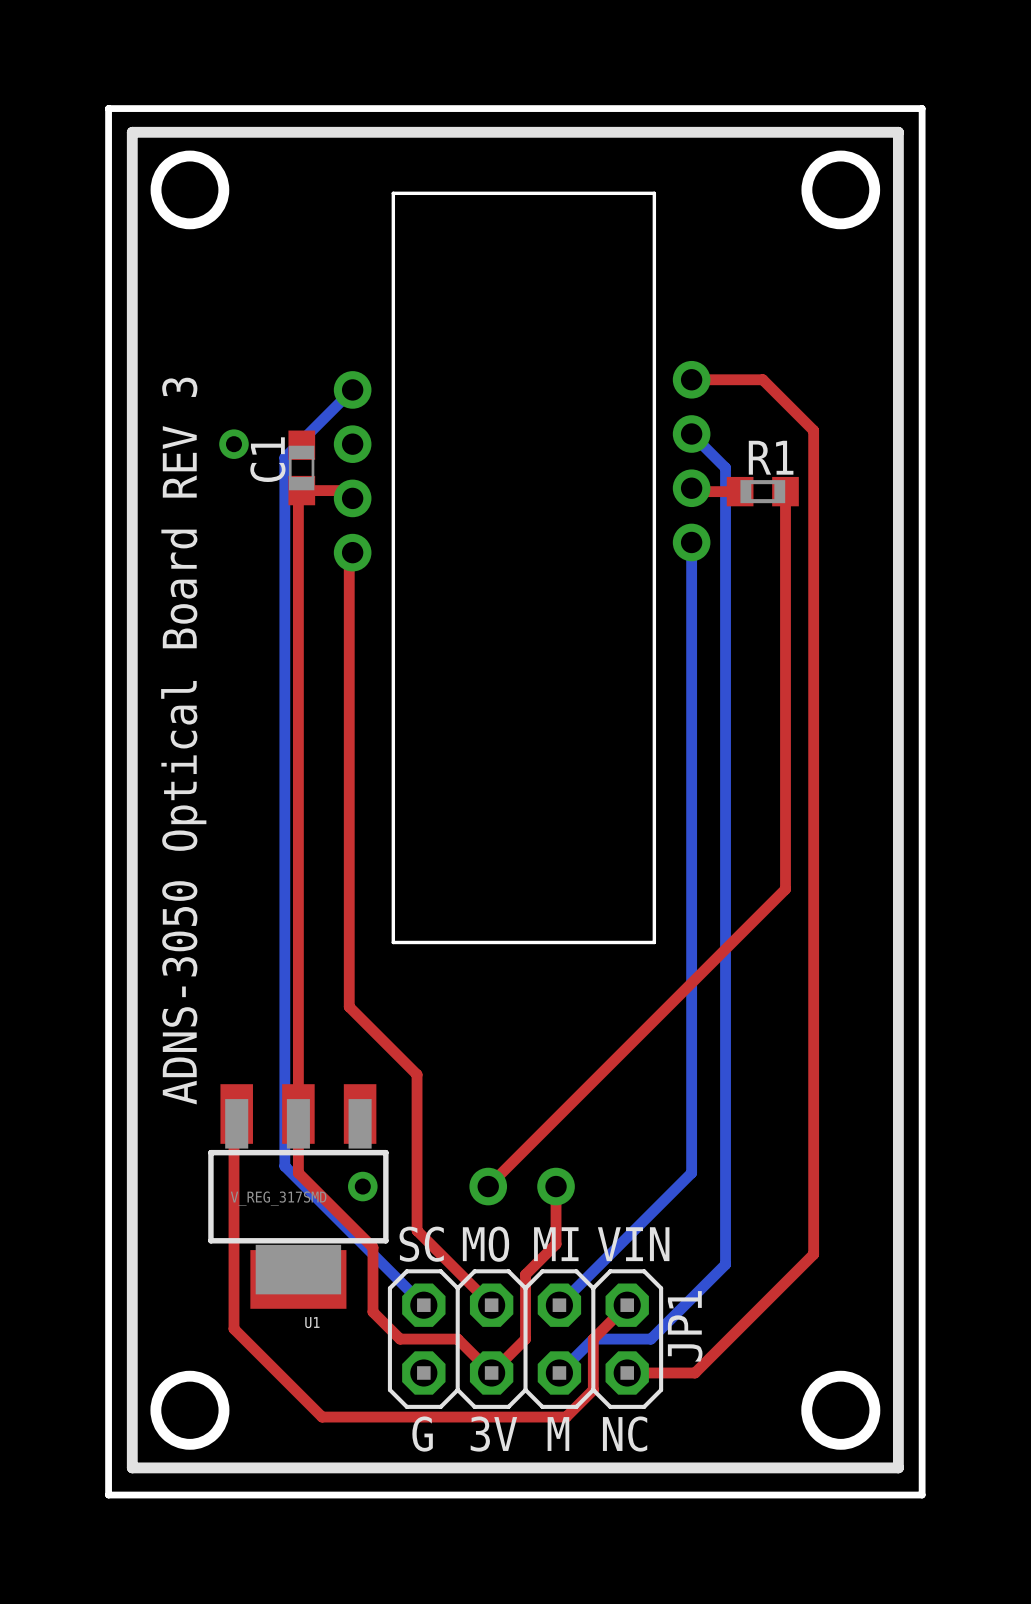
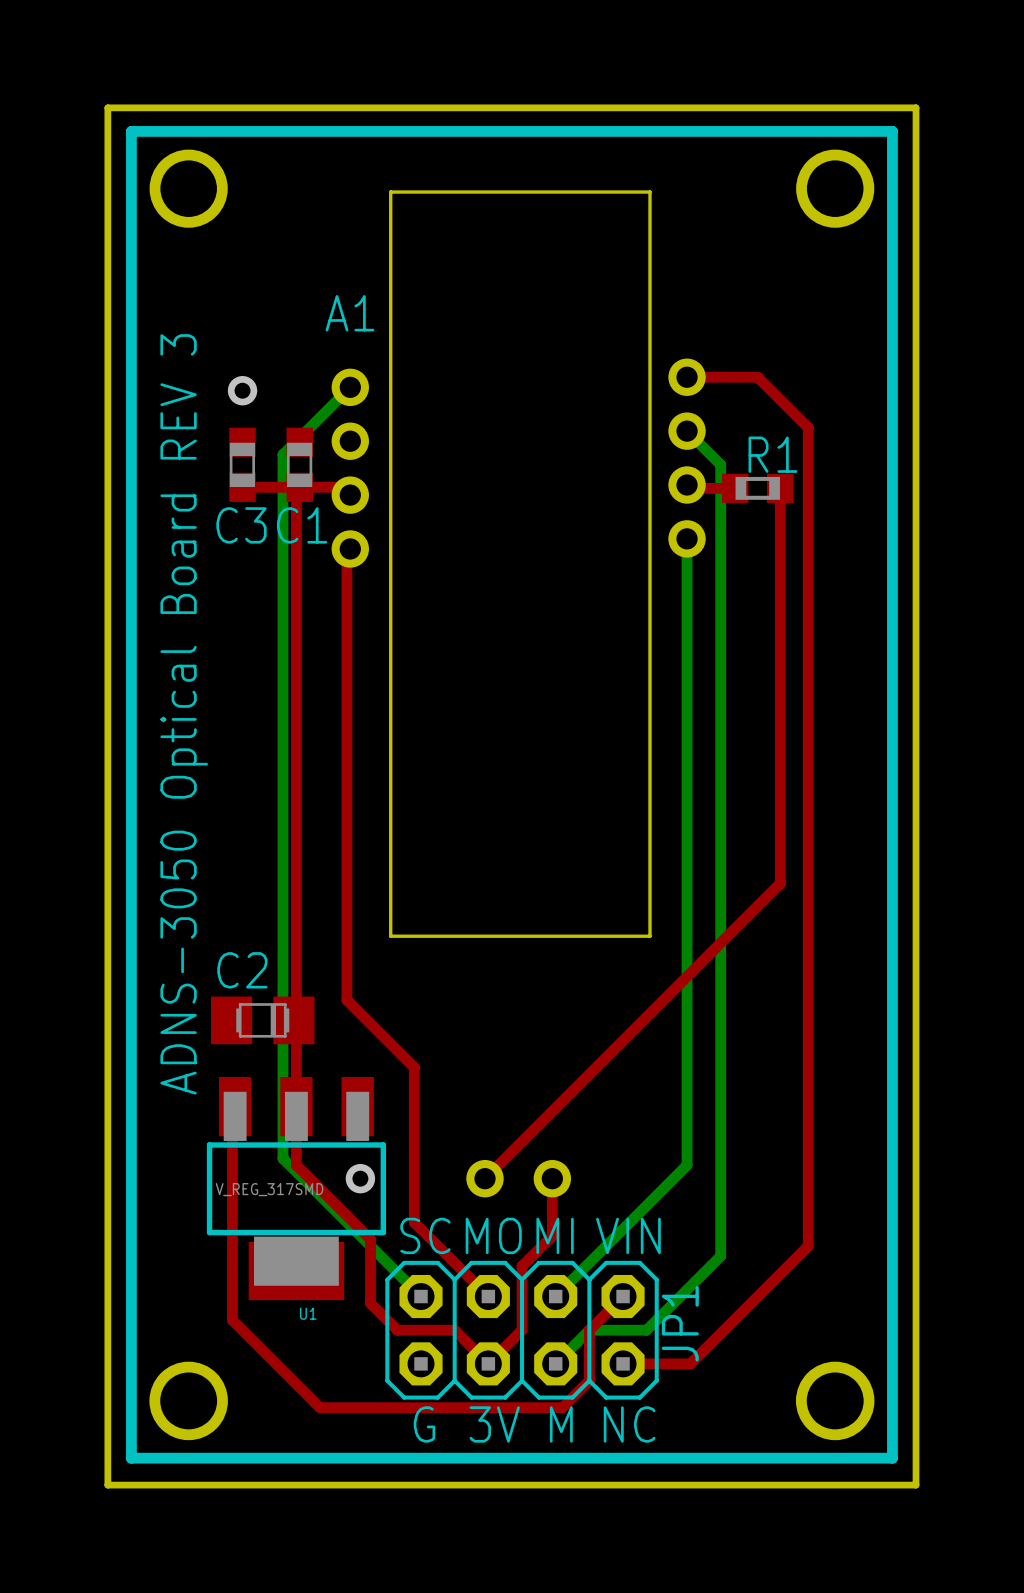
text: none -> A1 (349, 313)
via position: (233, 444) -> (242, 390)
C1 name rotation: 0° (267, 459) -> 90° clockwise (302, 525)
C1 name position: C1 (267, 459) -> C1 (302, 525)
C3: none -> (242, 464)
top track: none -> (242, 487) (299, 487)
C2: none -> (262, 1020)

